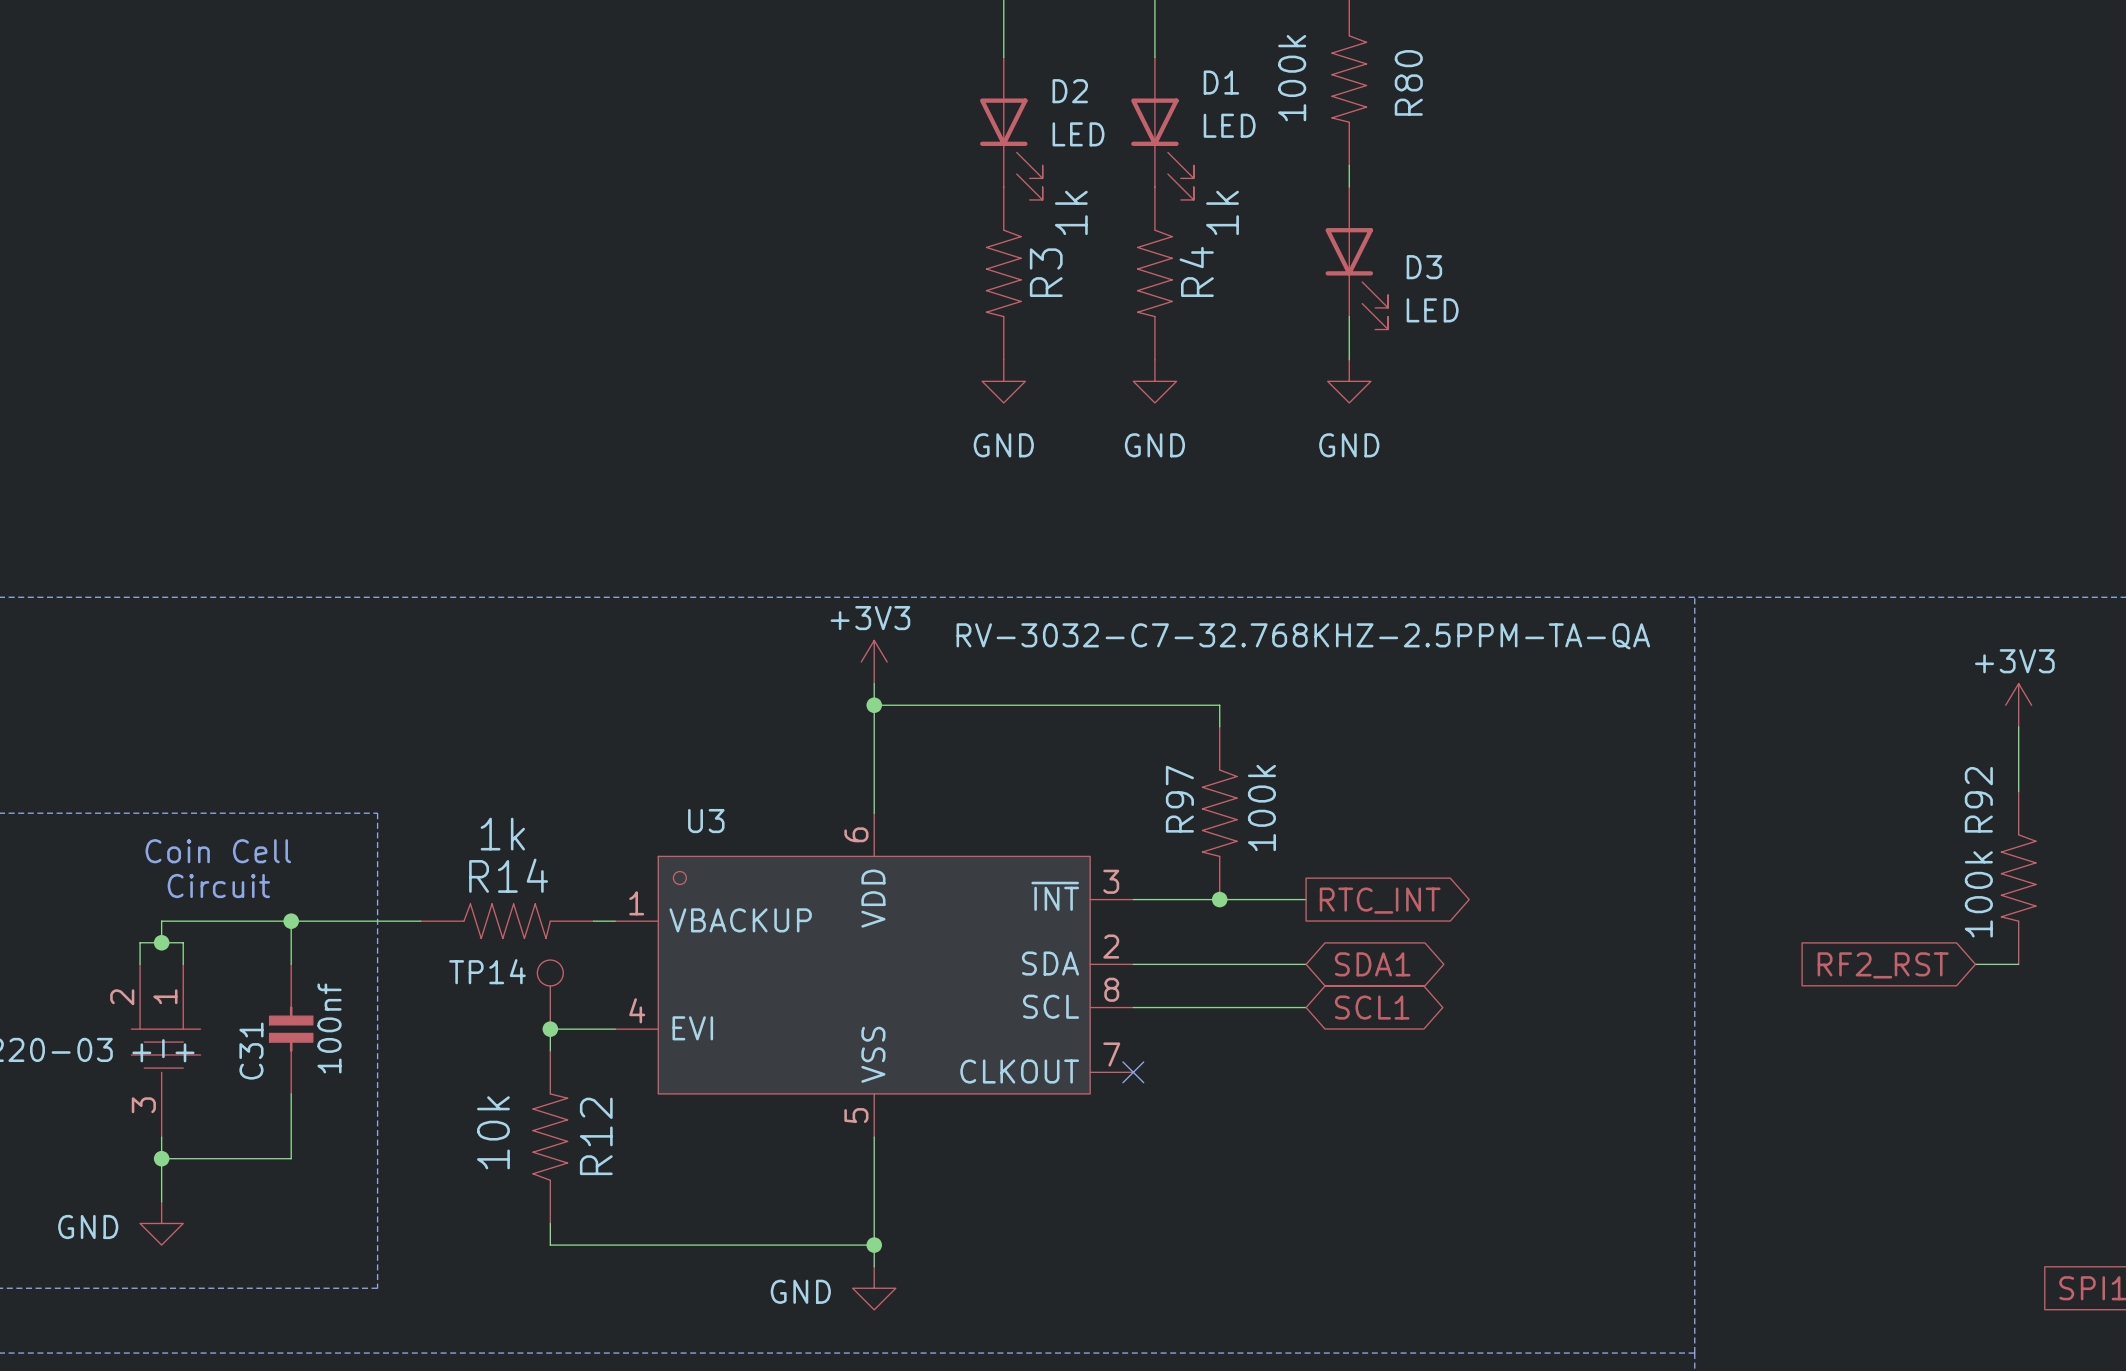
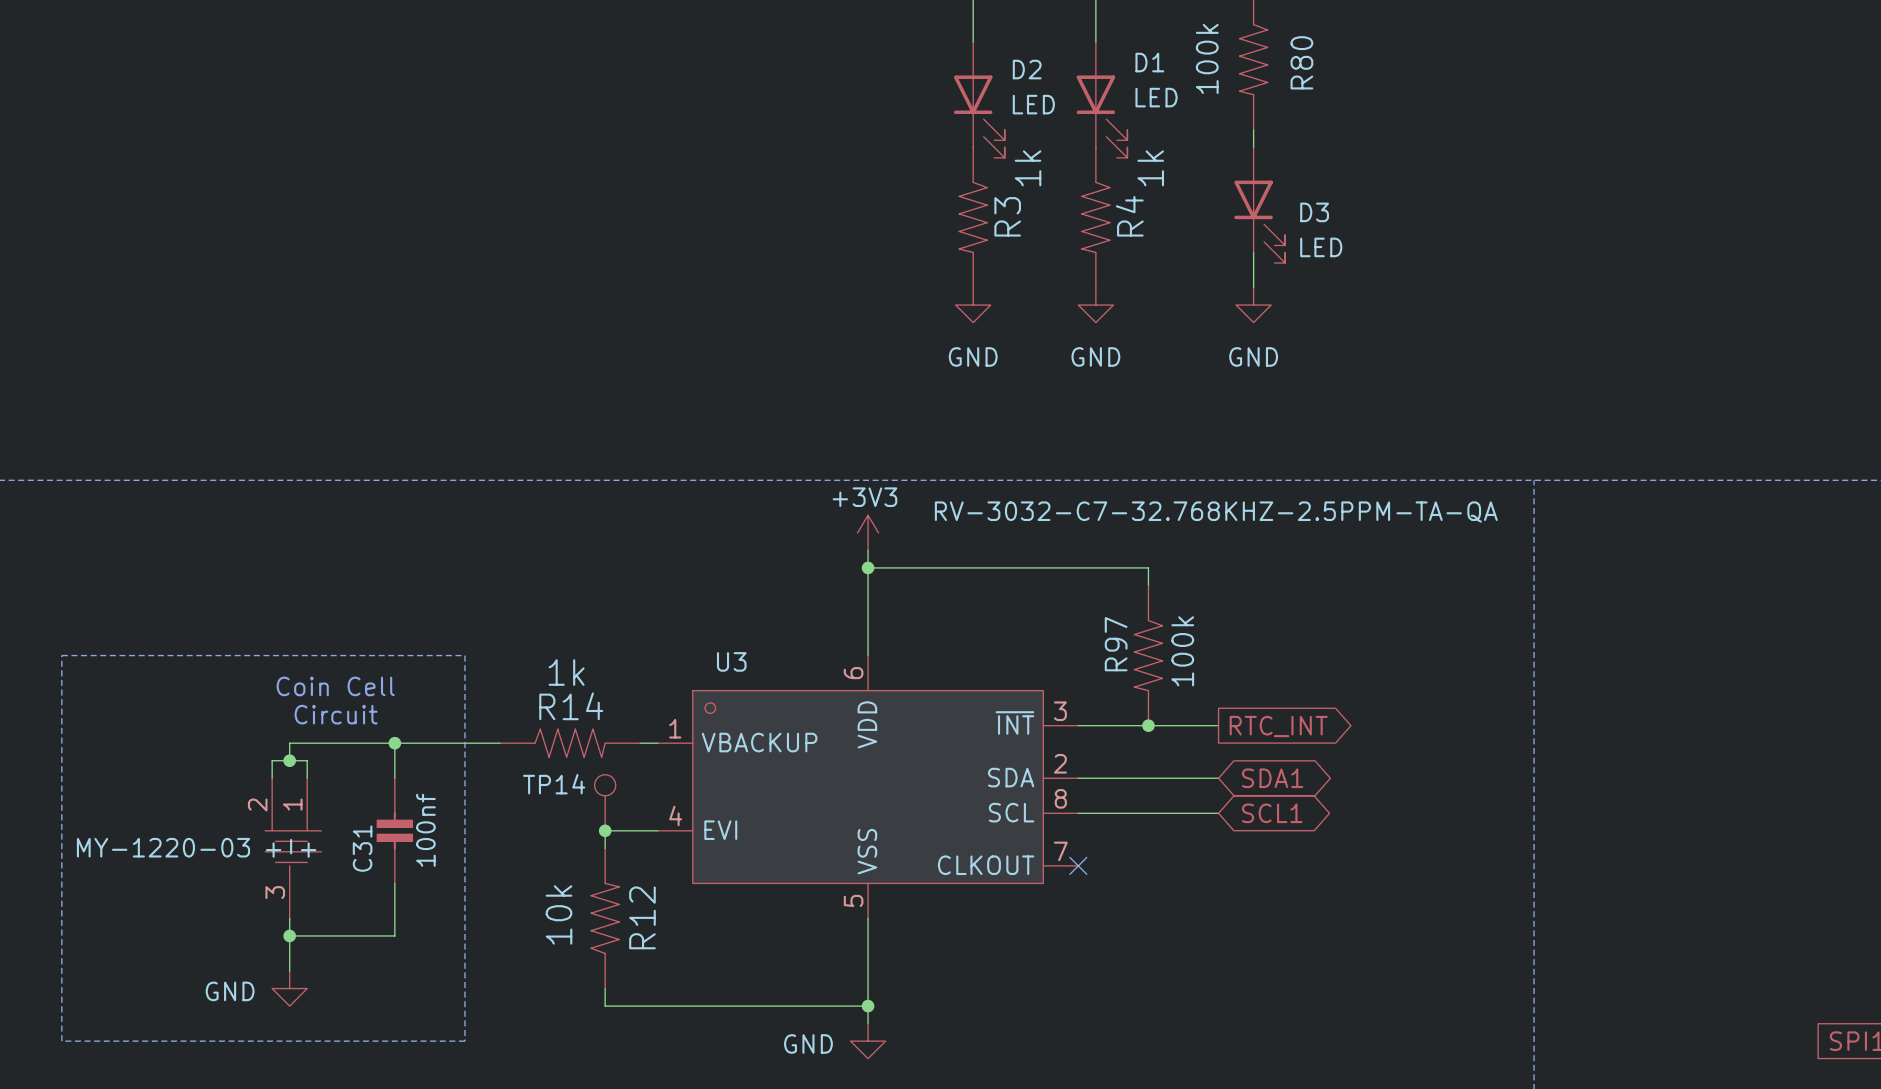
power symbol: +3V3 (2018, 705) -> none
wire: (2018, 726) (2018, 791) -> none
R92: 100k (2018, 877) -> none
wire: (1975, 964) (2018, 964) -> none
global label: RF2_RST (1883, 965) -> none

